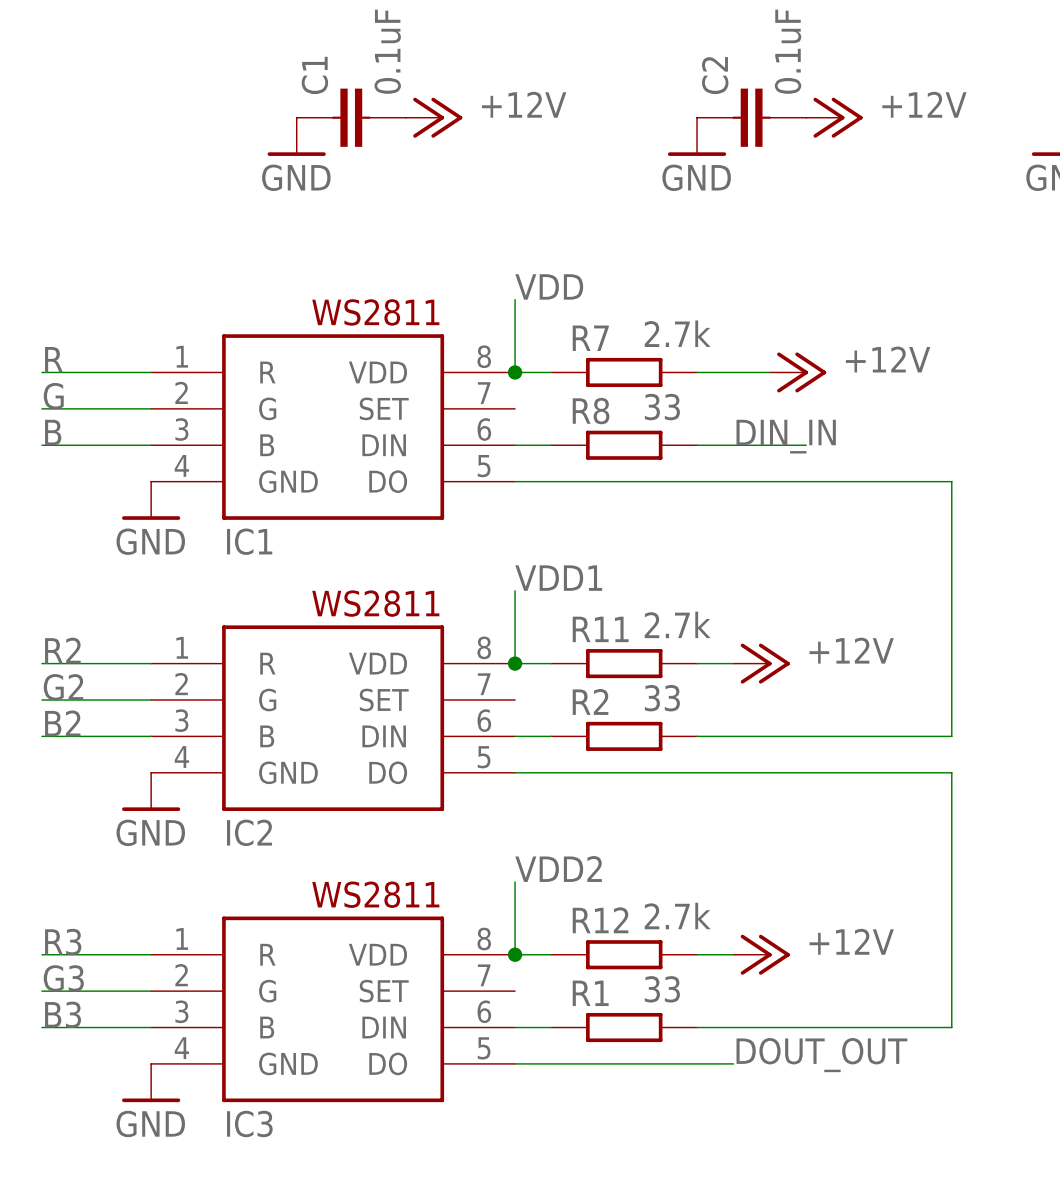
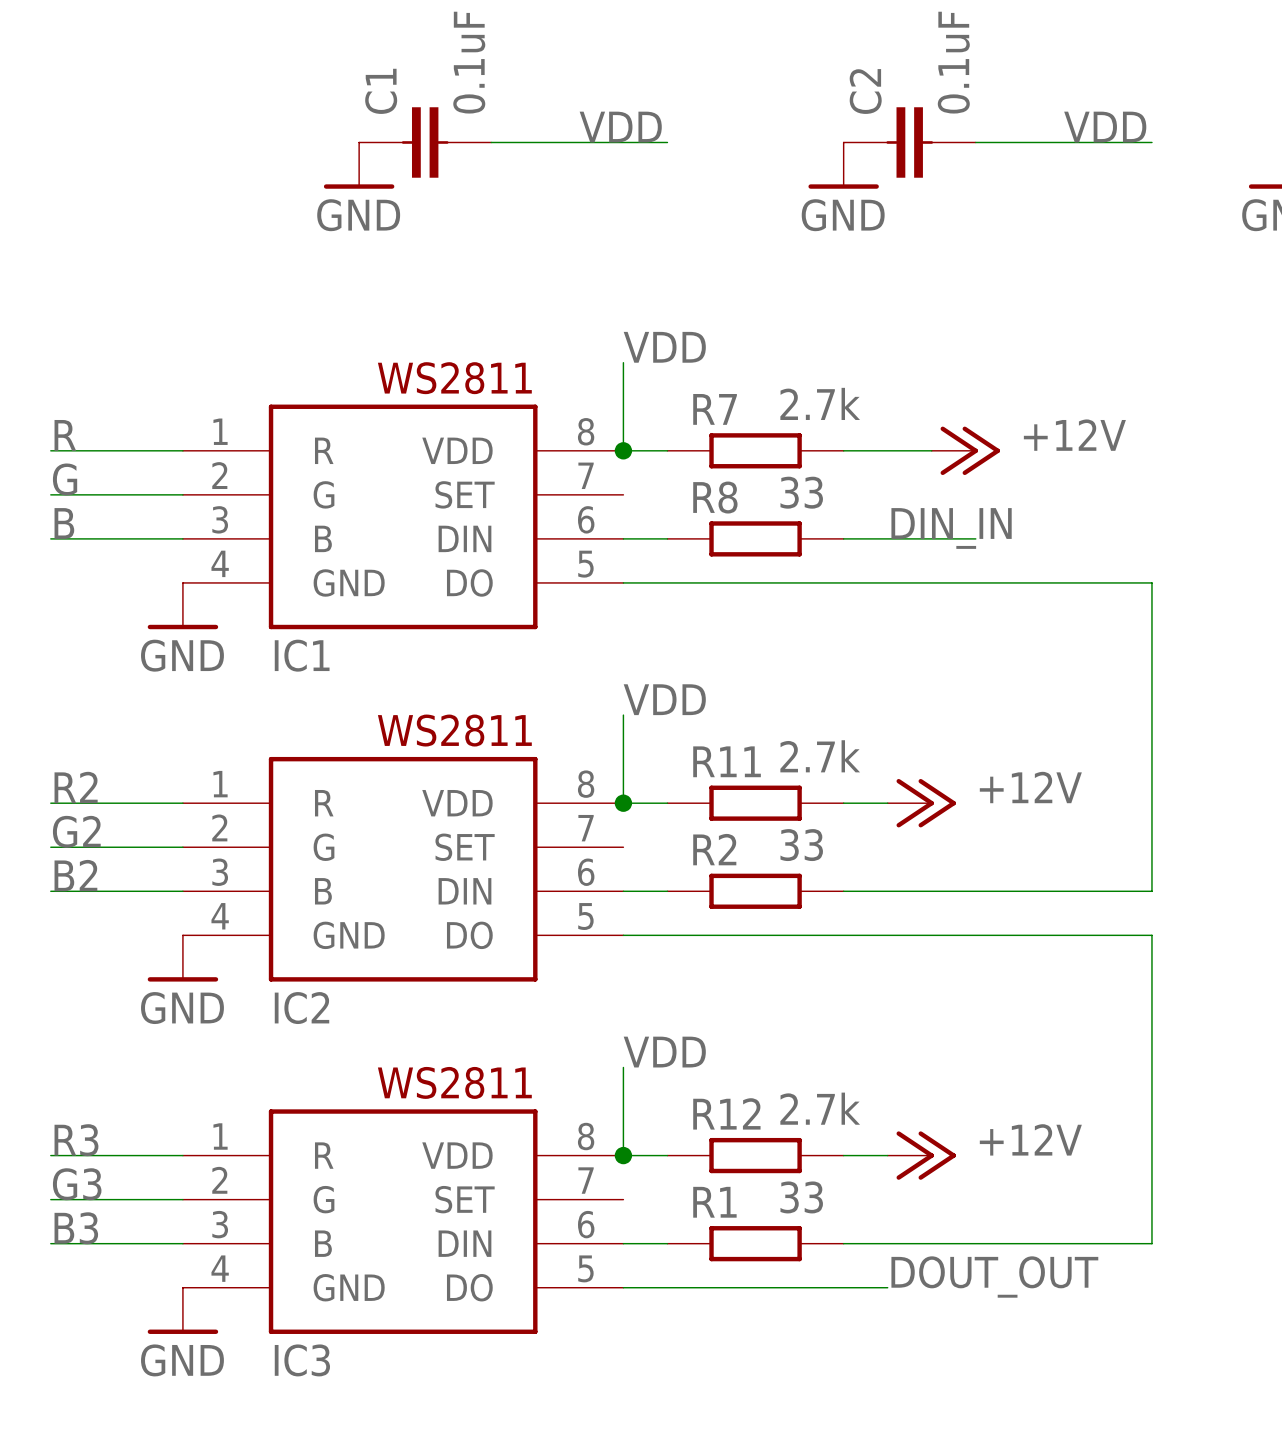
label: none -> VDD (620, 127)
label: none -> VDD (1105, 127)
wire: none -> (491, 142) (667, 142)
power symbol: +12V (434, 117) -> none
wire: none -> (975, 142) (1151, 142)
power symbol: +12V (834, 117) -> none
label: VDD1 (558, 578) -> VDD (664, 699)
label: VDD2 (558, 868) -> VDD (664, 1052)

